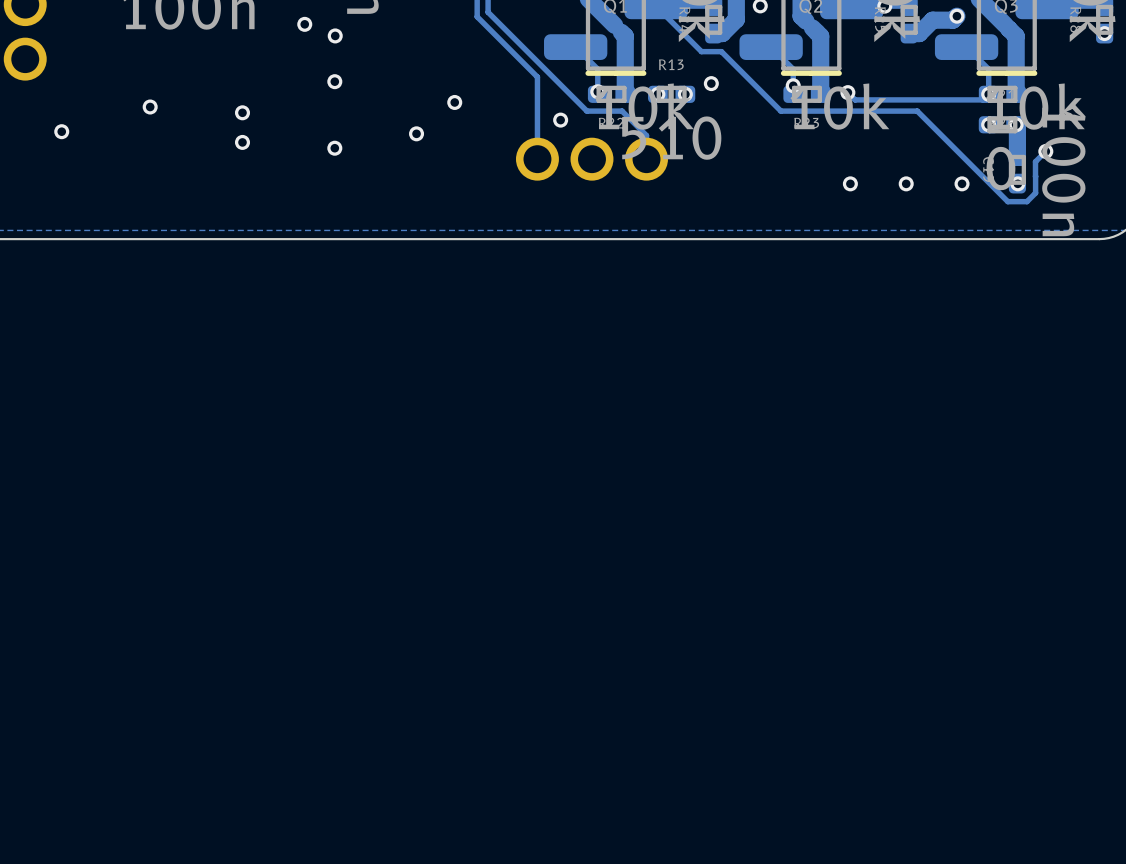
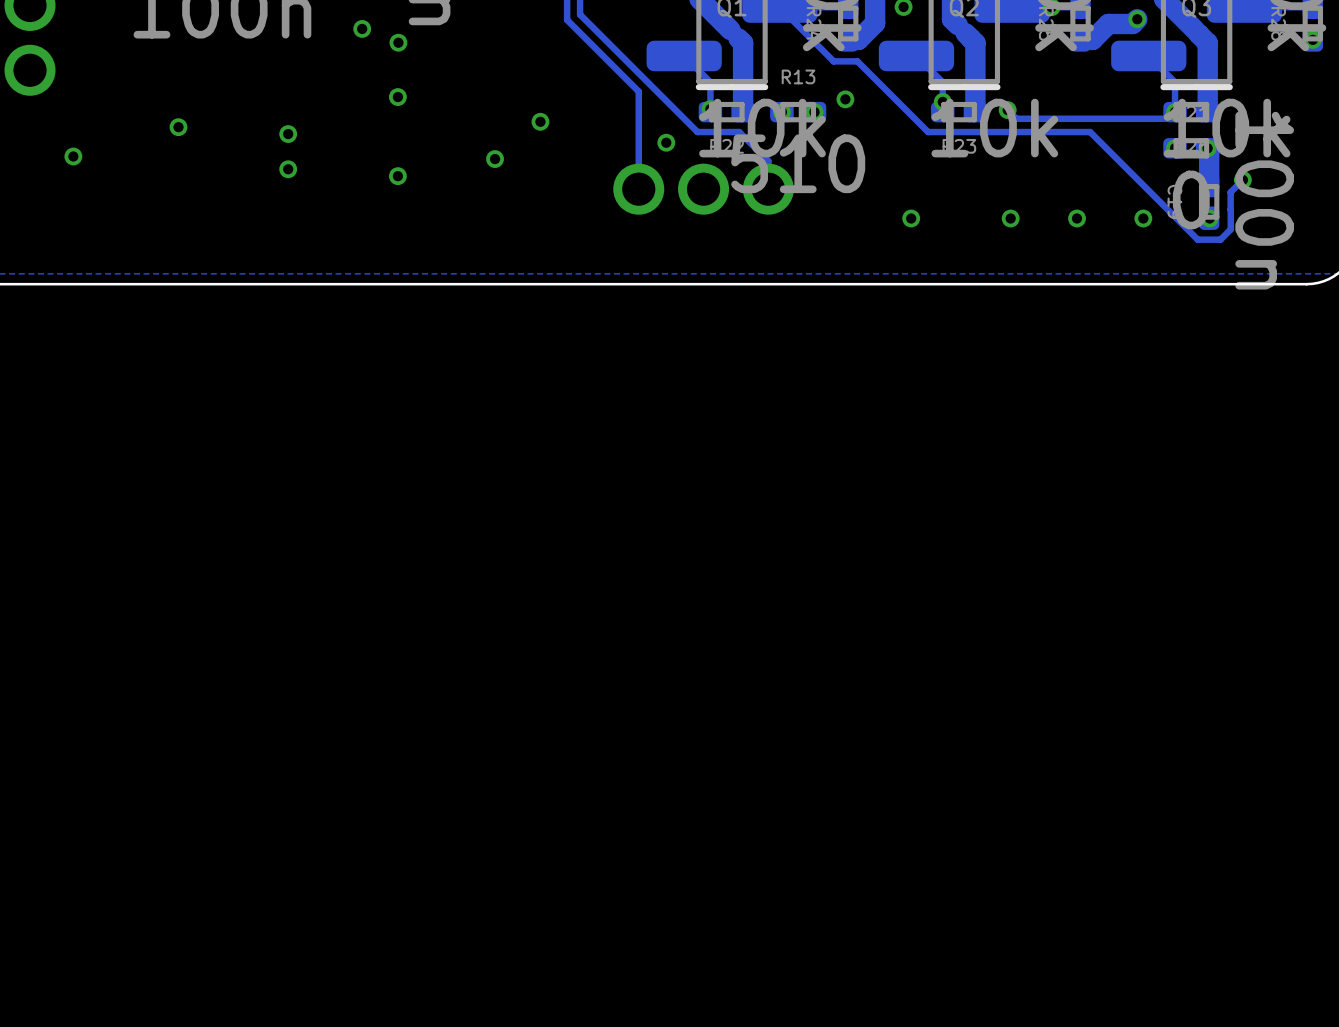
via: none -> (911, 218)

